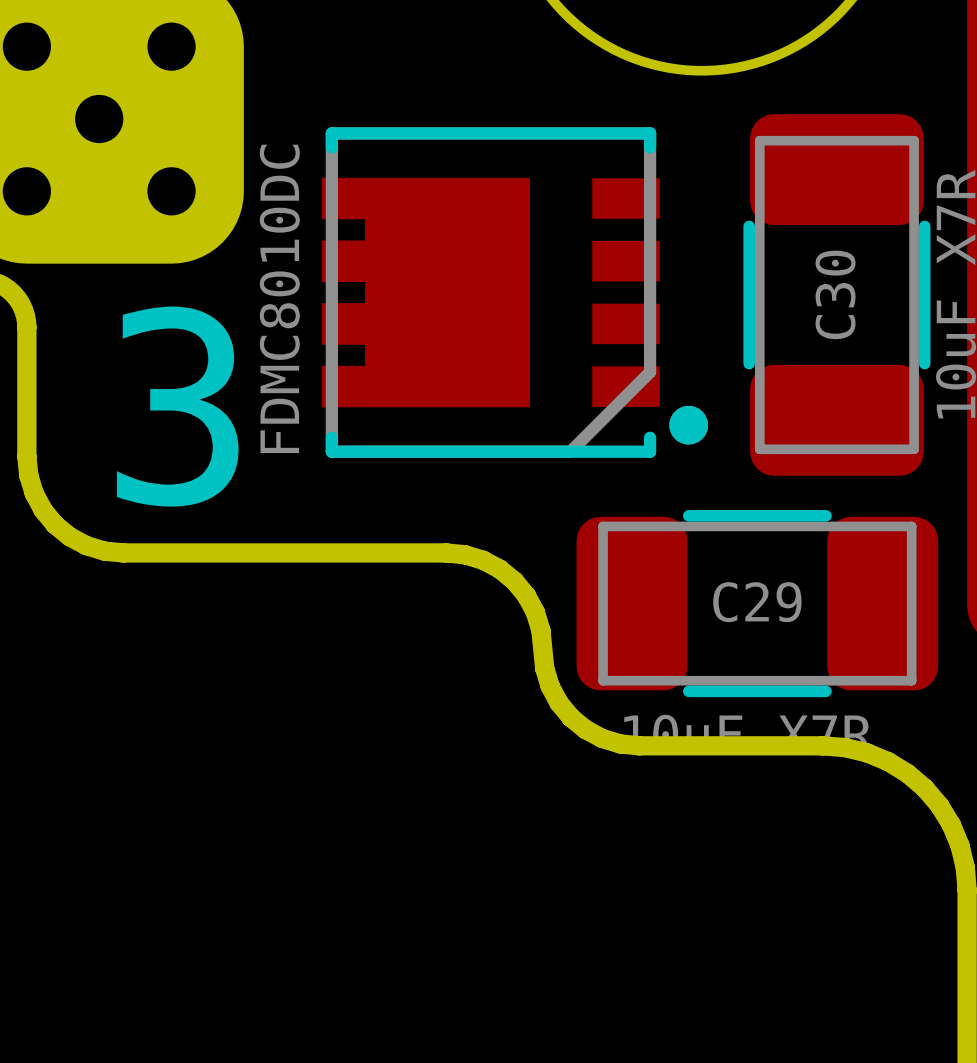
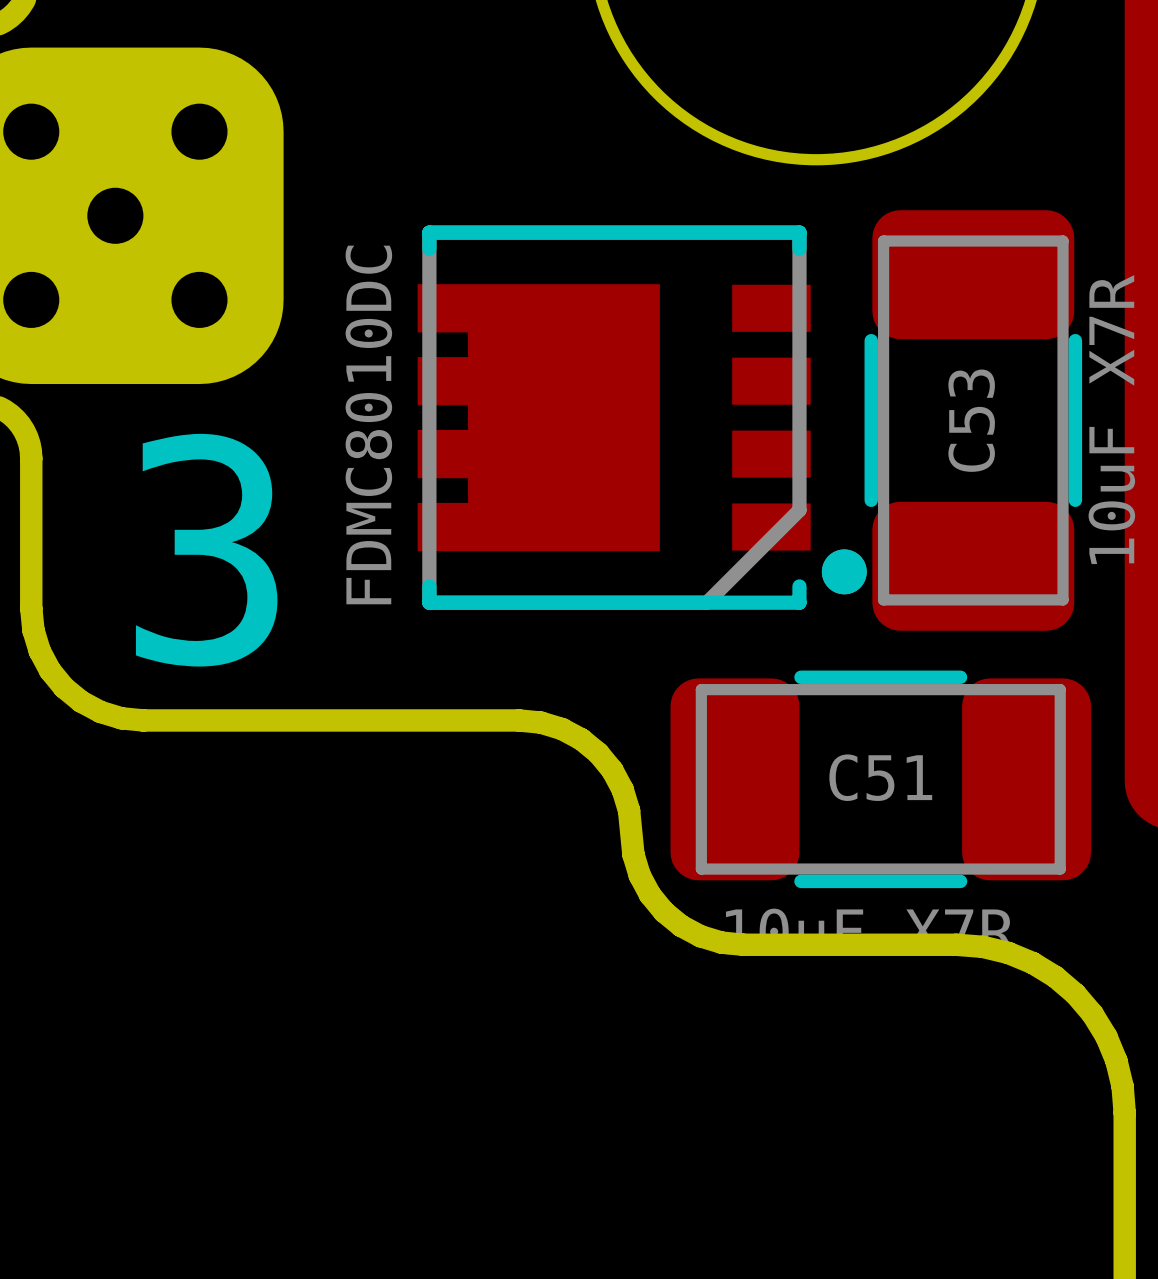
part position: (514, 292) -> (642, 417)
C30 name: C30 (835, 294) -> C53 (971, 420)
C29 name: C29 (757, 602) -> C51 (880, 777)

